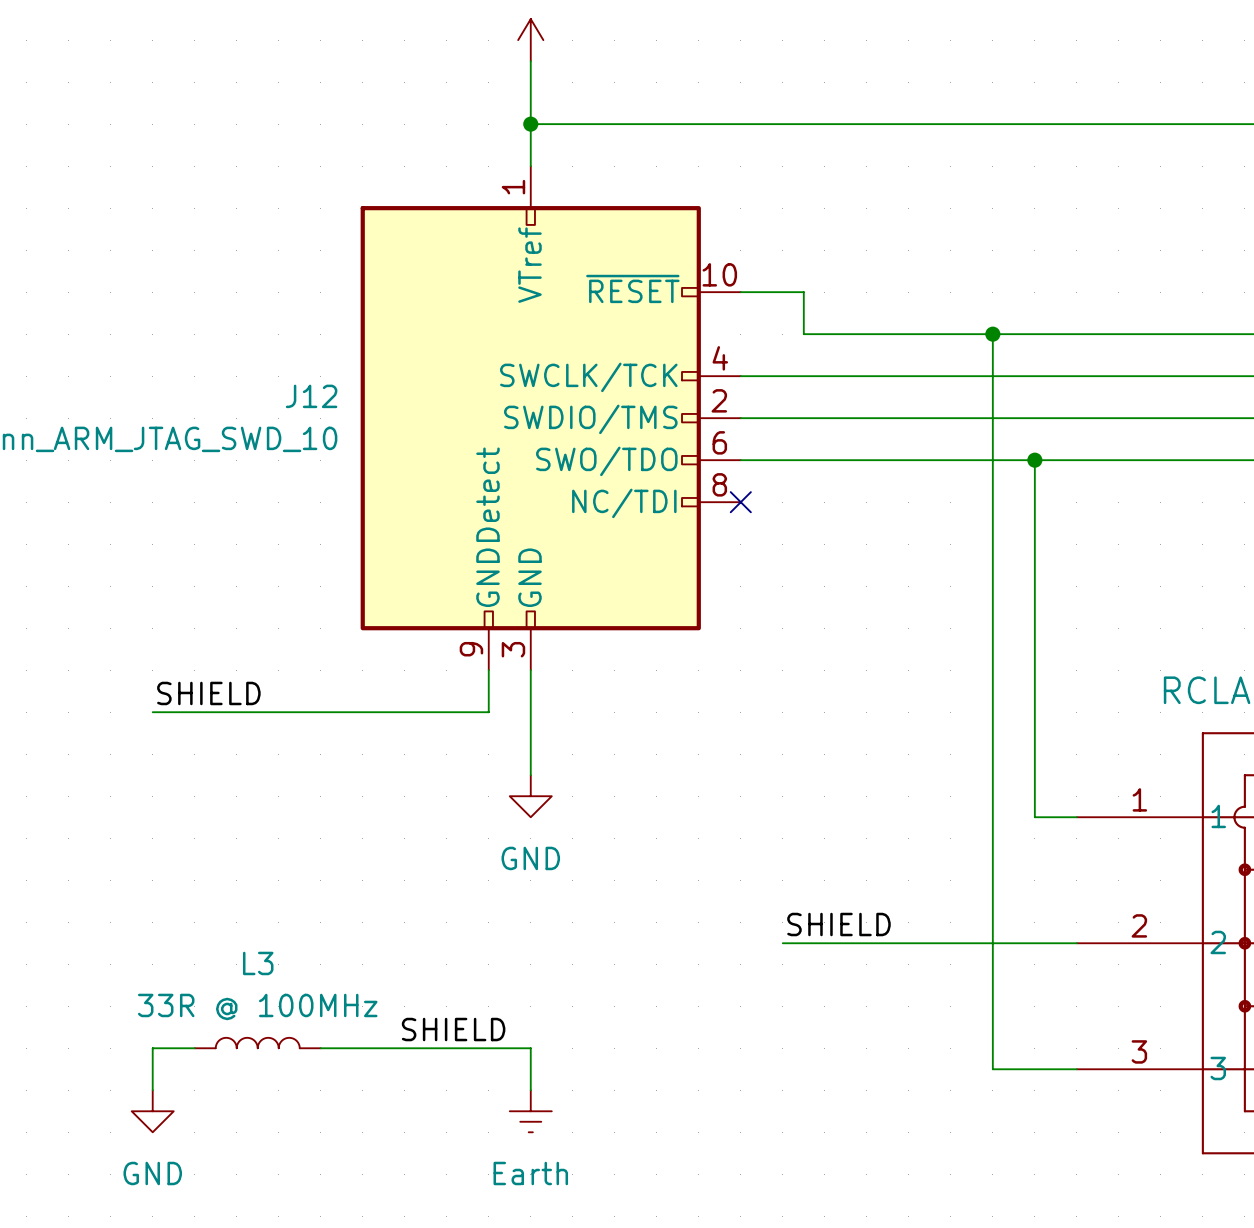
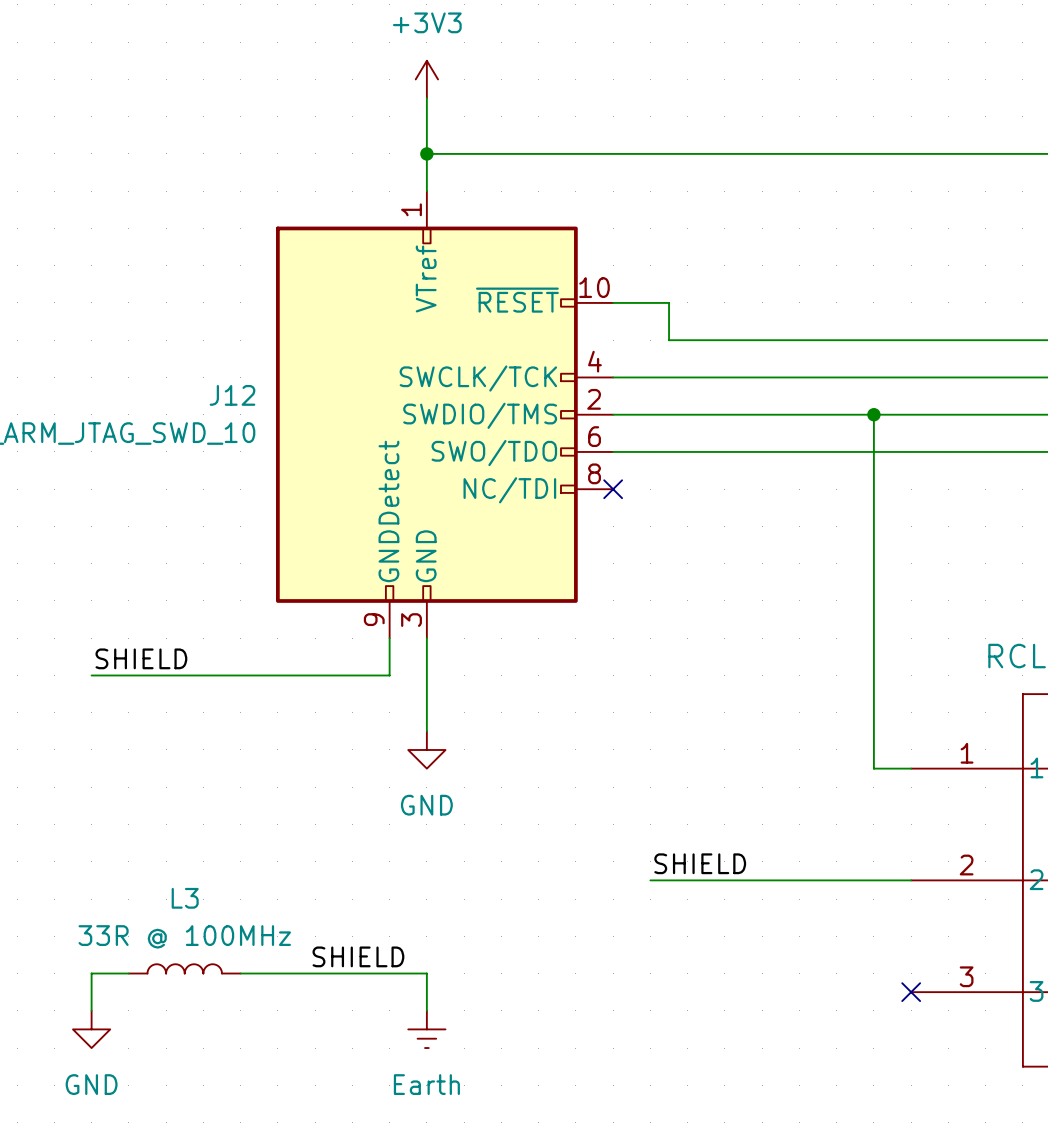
wire: (992, 334) (992, 1069) (1076, 1069) -> none
junction: (992, 334) -> none
wire: none -> (873, 414) (873, 451)
junction position: (1034, 460) -> (873, 414)
no-connect mark: none -> (911, 992)

